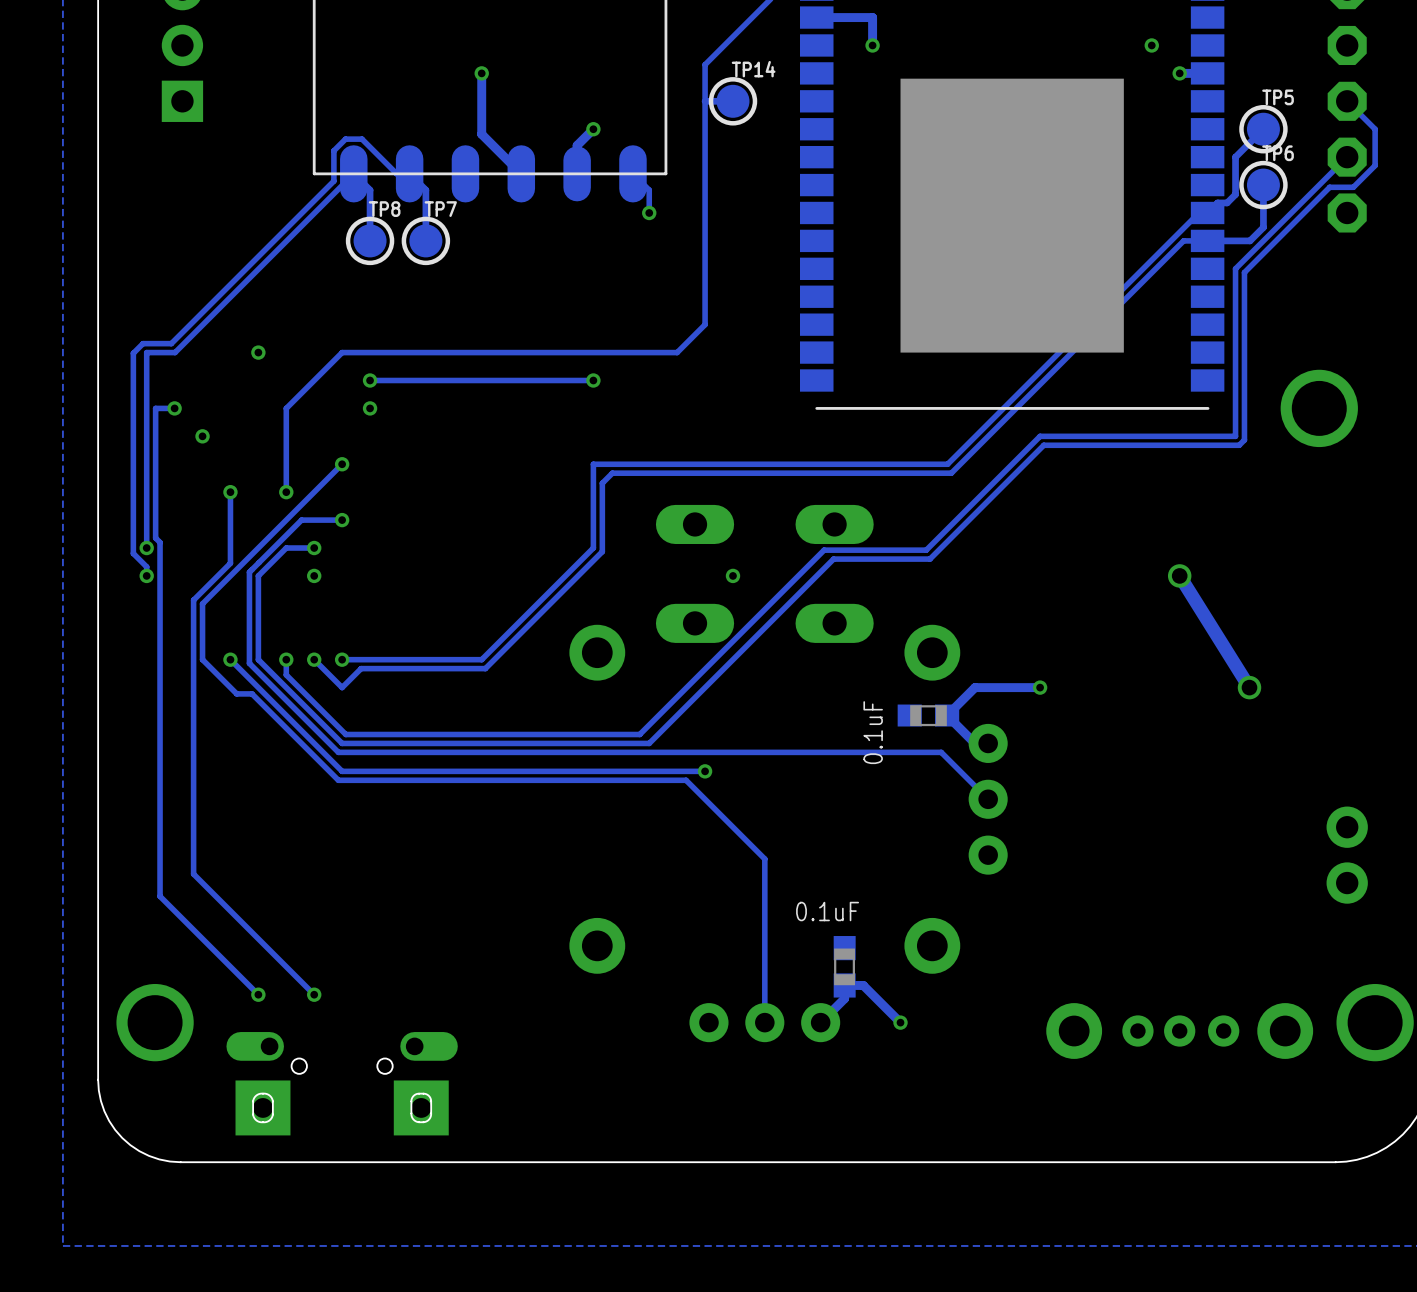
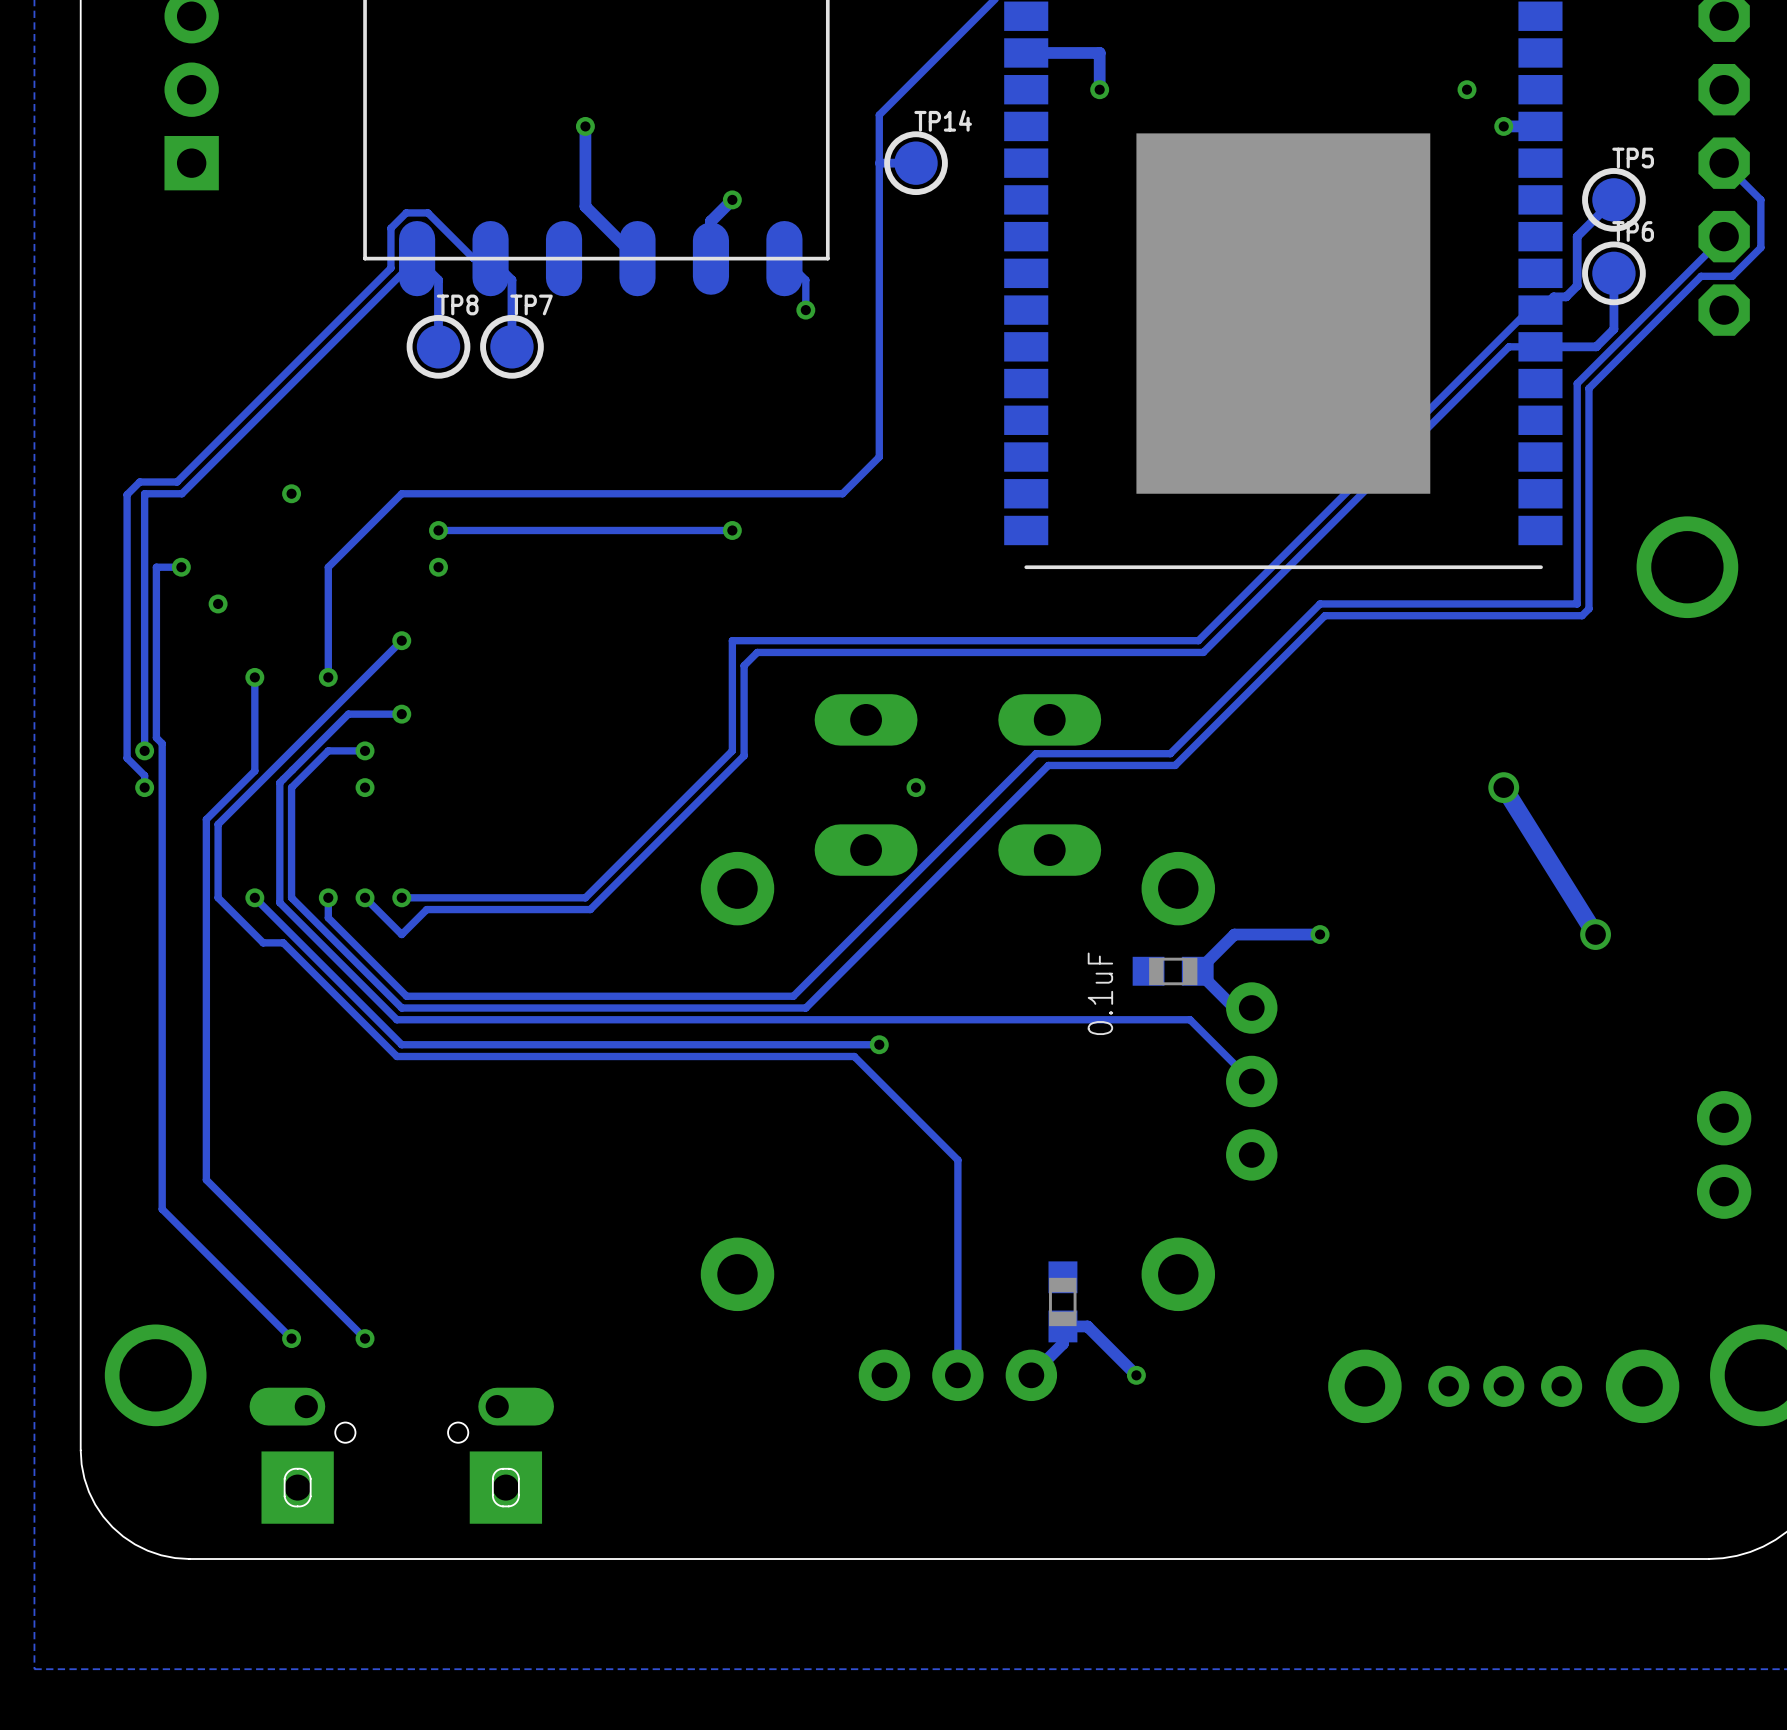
part value: 0.1uF (827, 911) -> none

